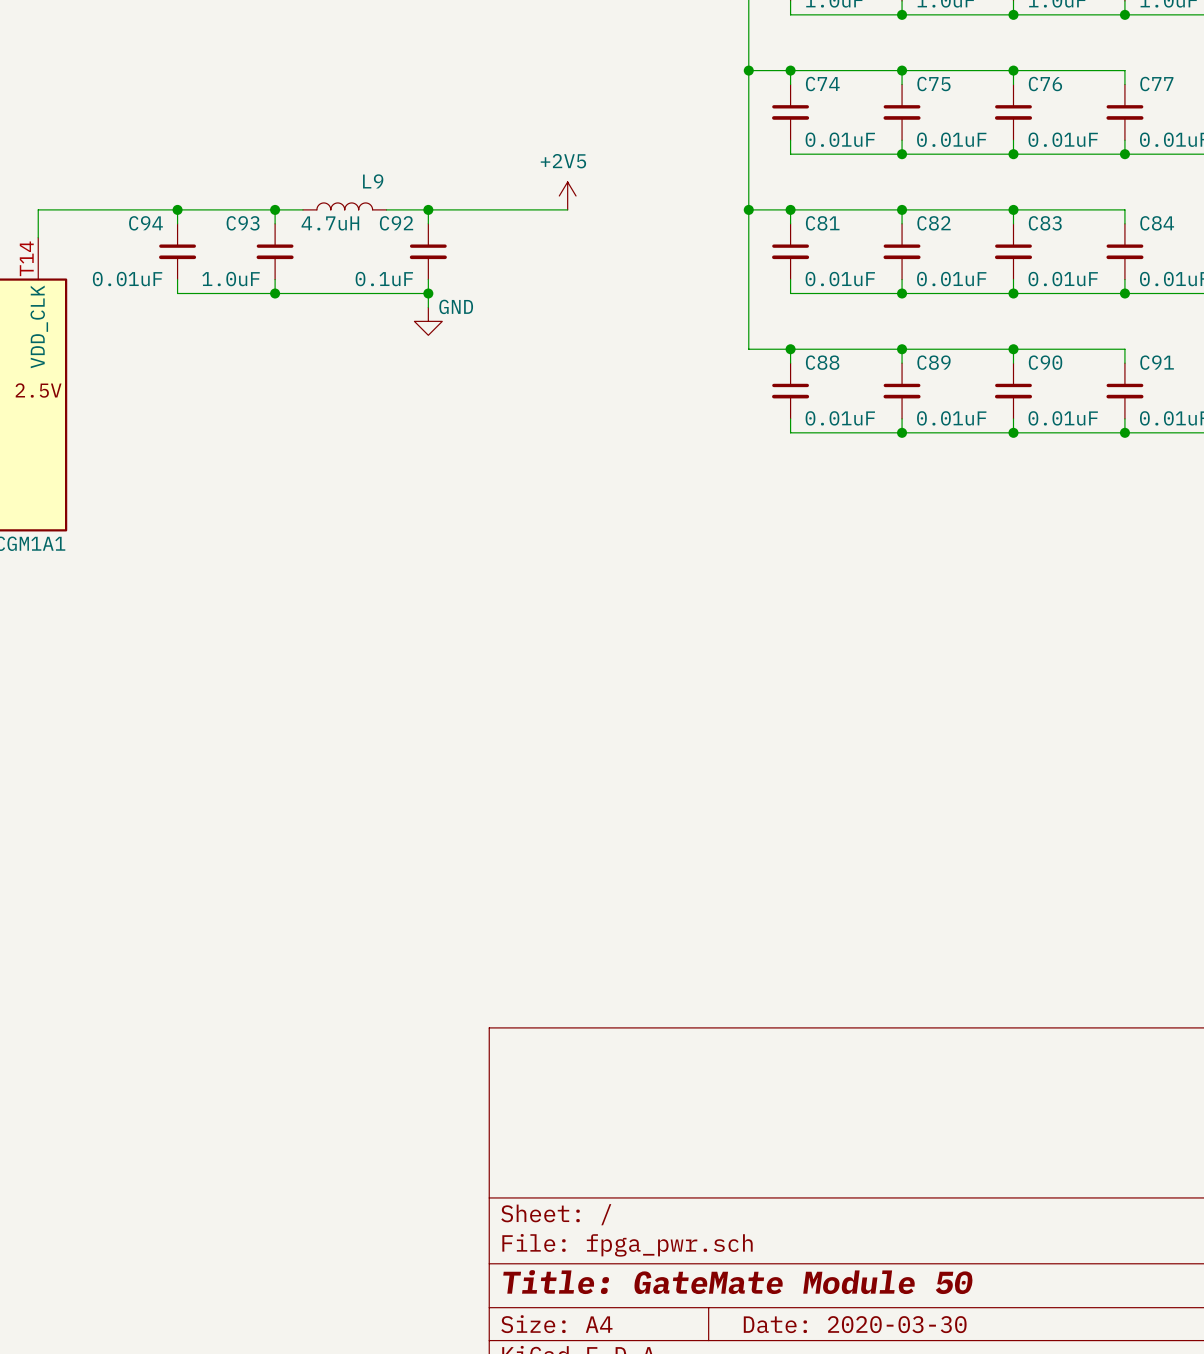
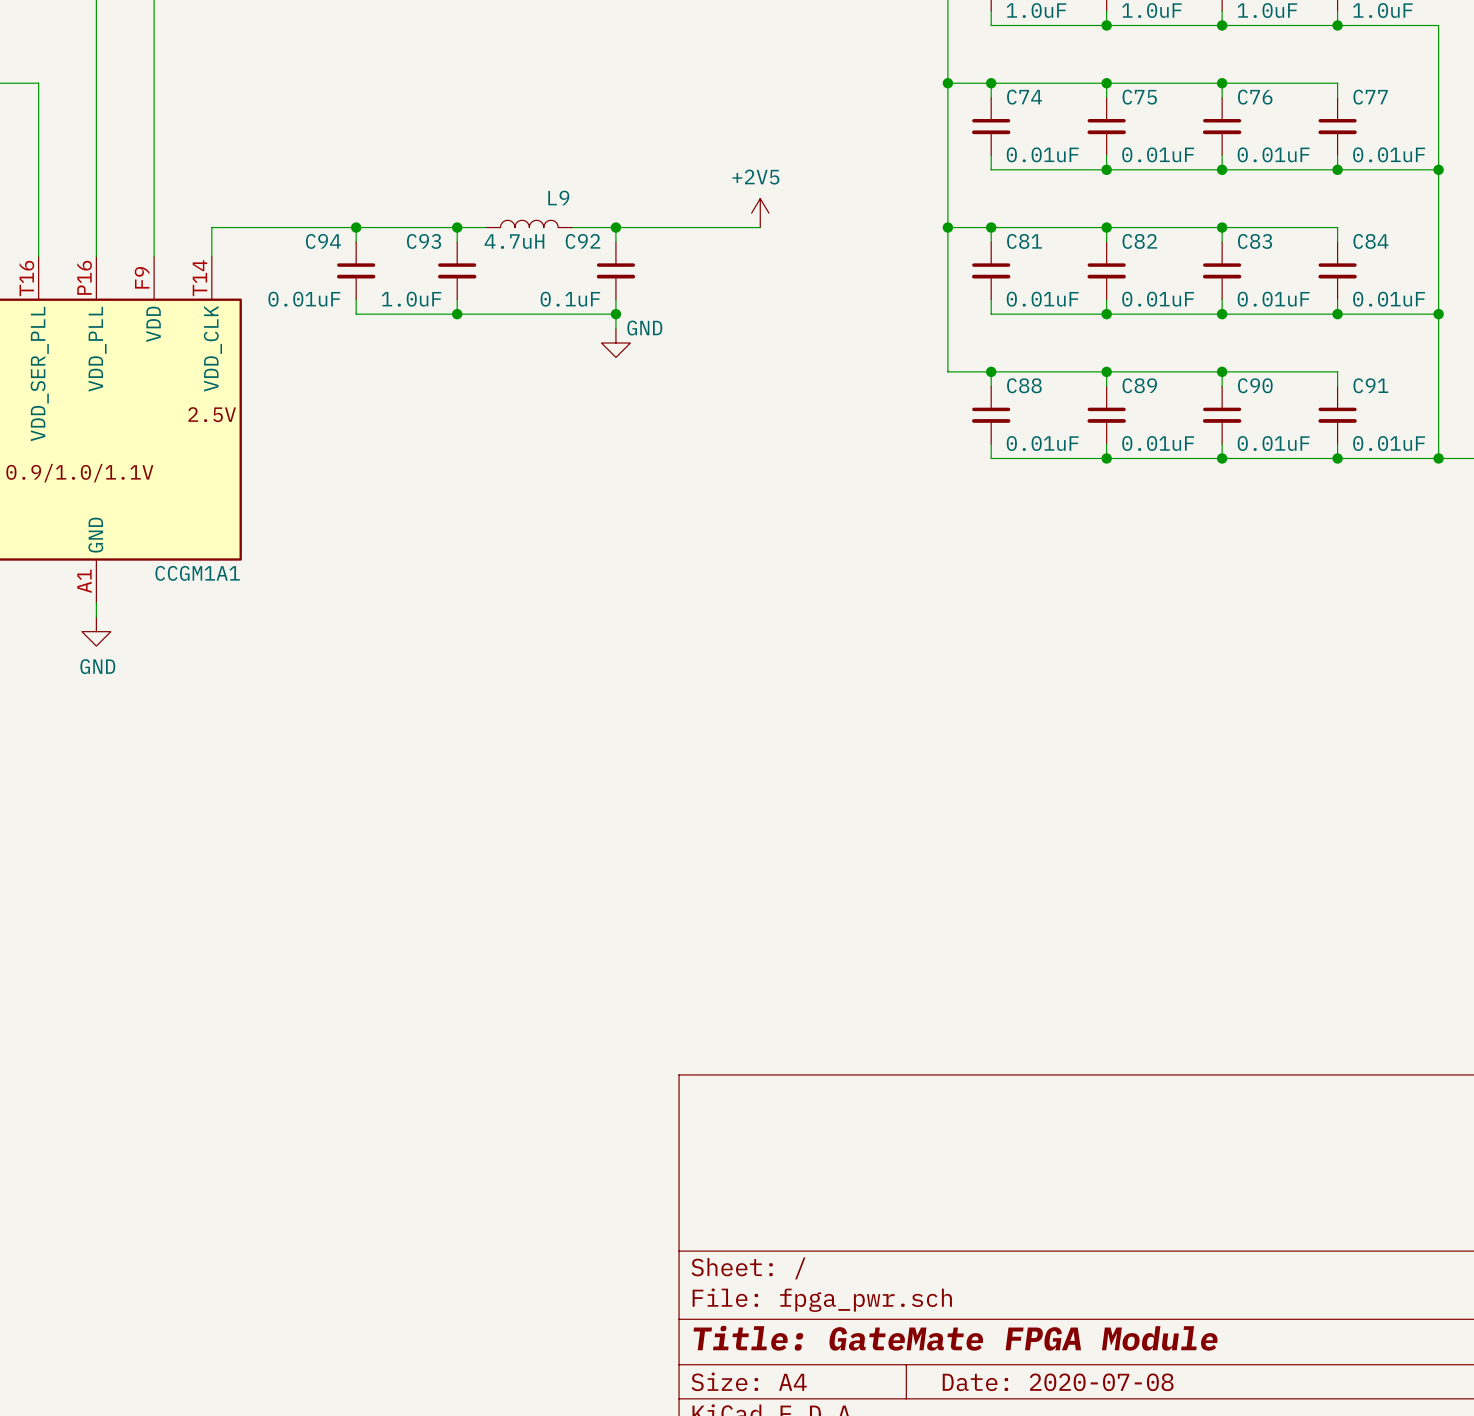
title block: Title: GateMate Module 50 (738, 1282) -> Title: GateMate FPGA Module (955, 1338)
title block: Date: 2020-03-30 (855, 1324) -> Date: 2020-07-08 (1058, 1382)

